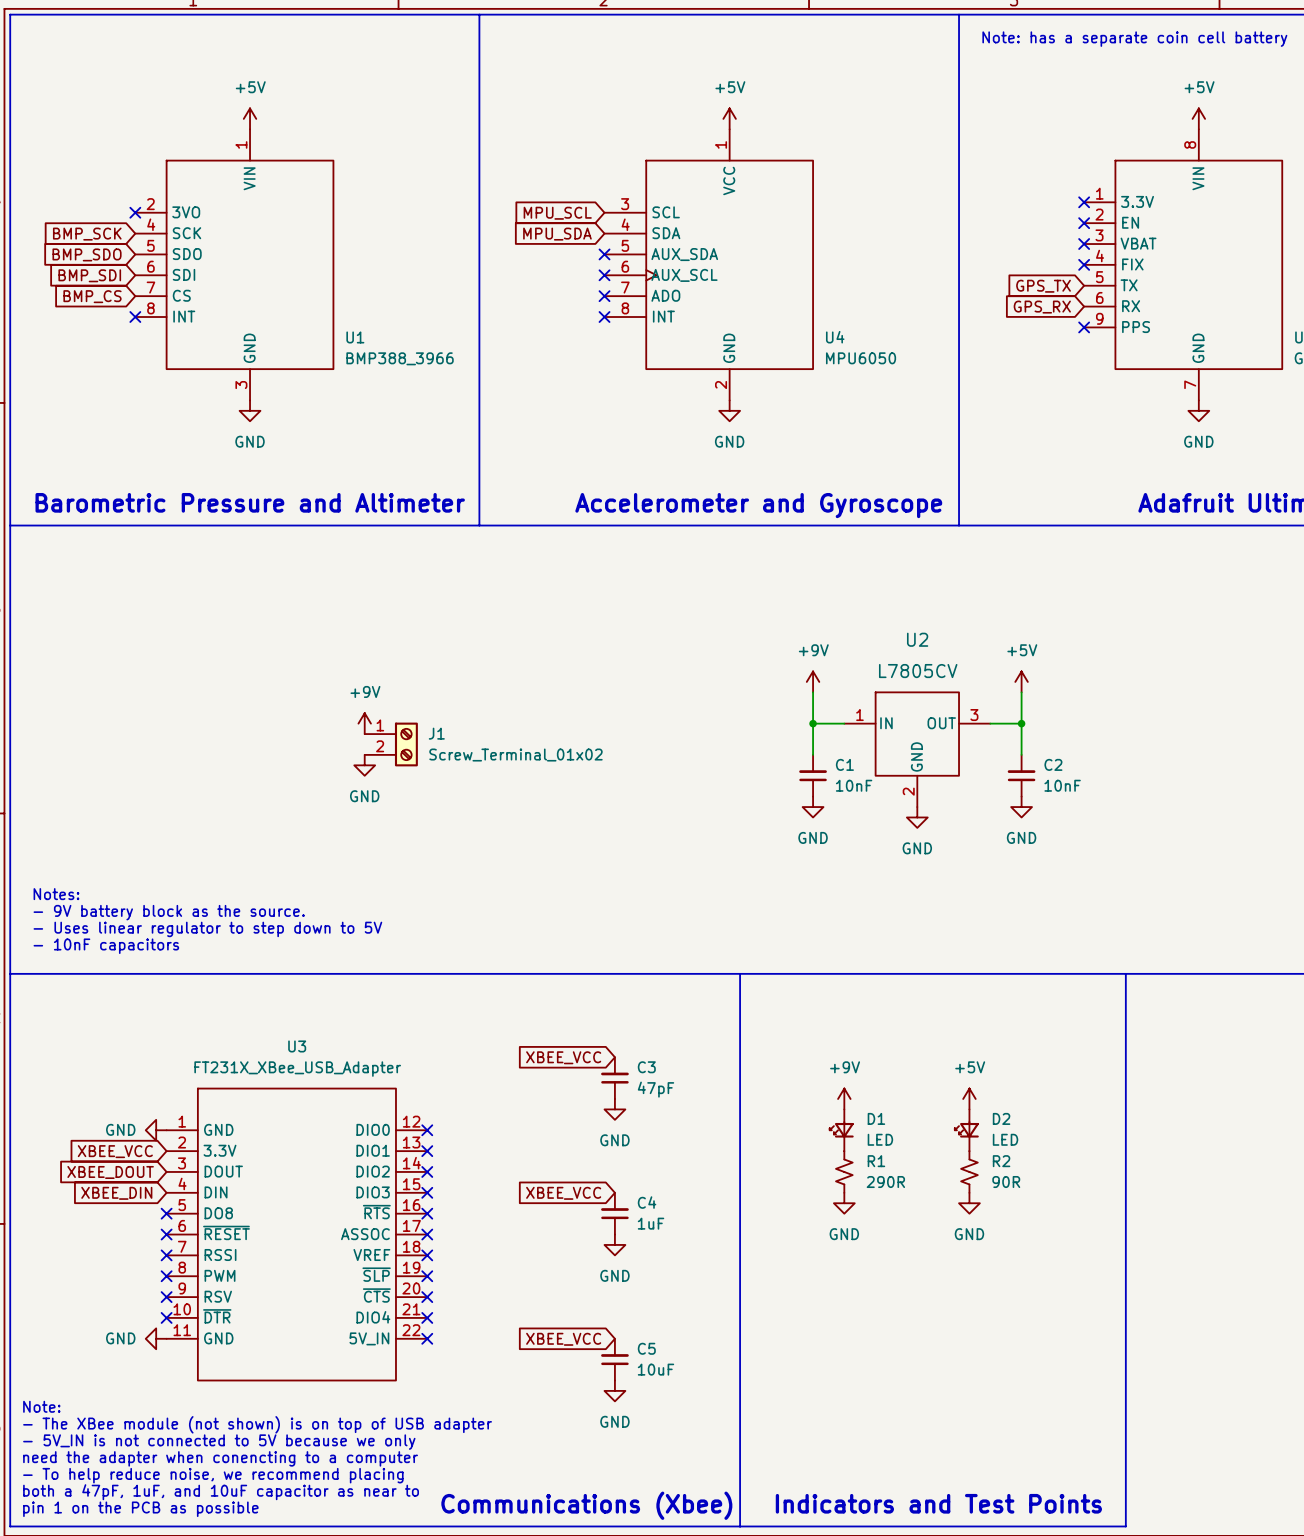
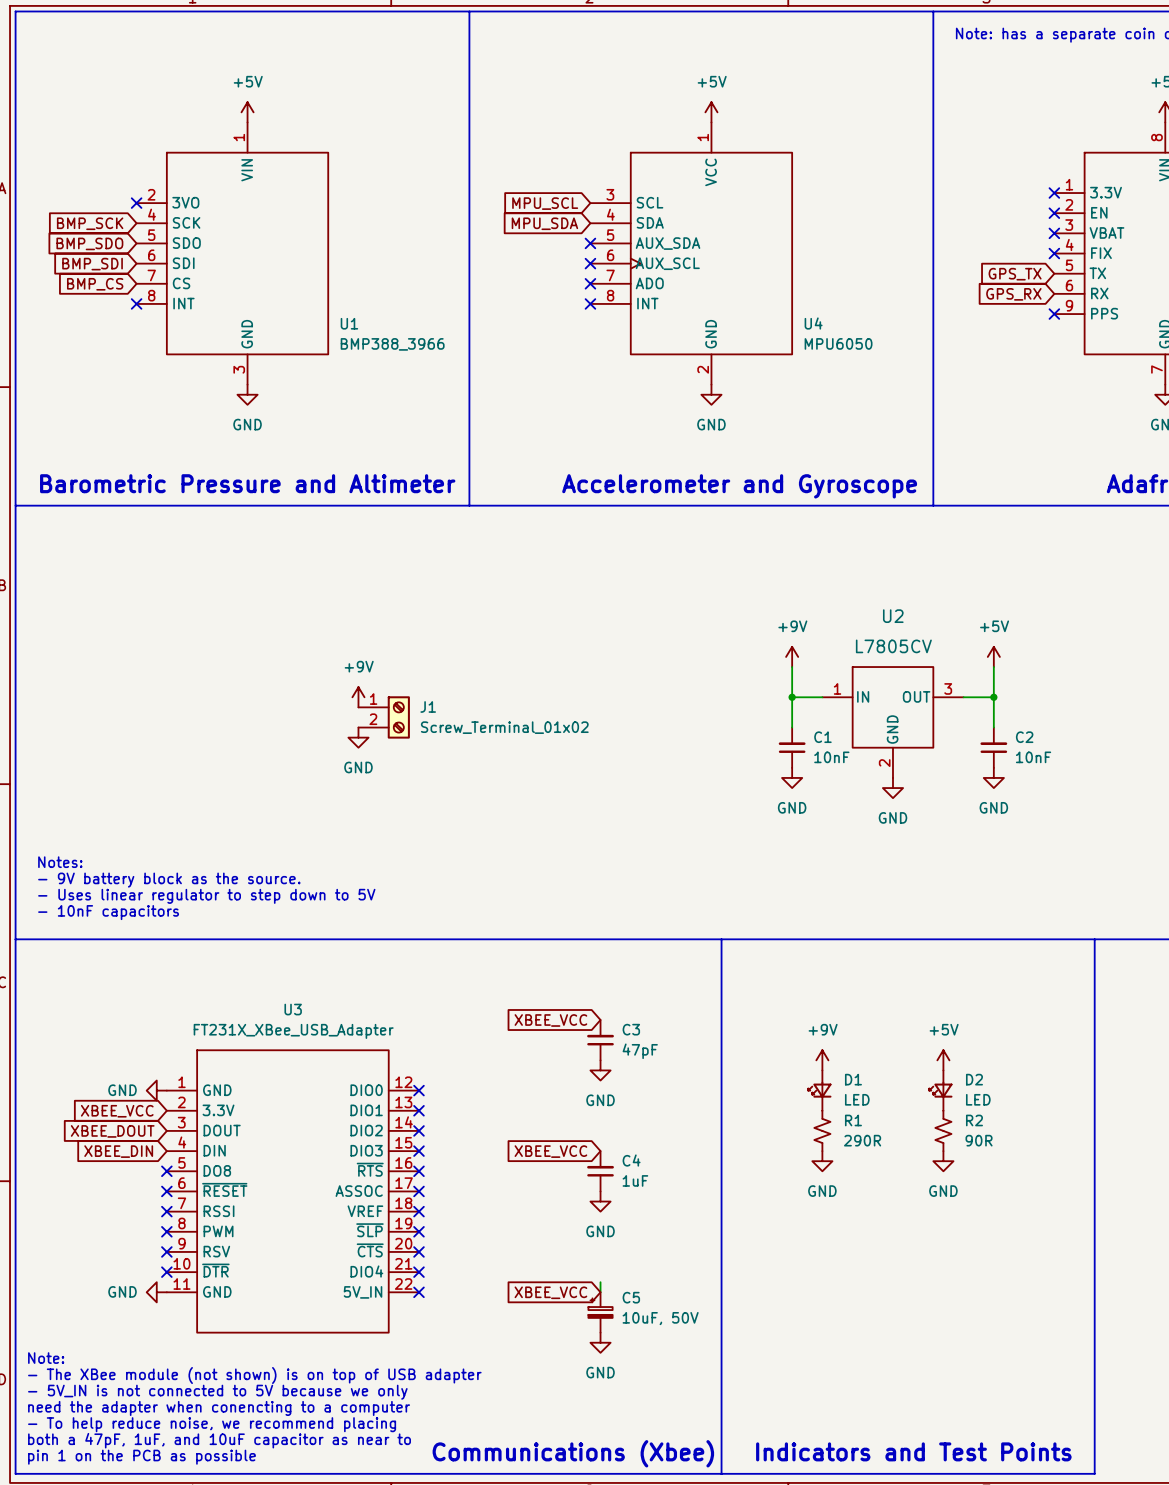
wire: none -> (600, 1282) (600, 1292)
C5 symbol: [601, 1338, 629, 1381] -> [588, 1292, 613, 1333]
C5 value: 10uF (655, 1369) -> 10uF, 50V (660, 1318)

